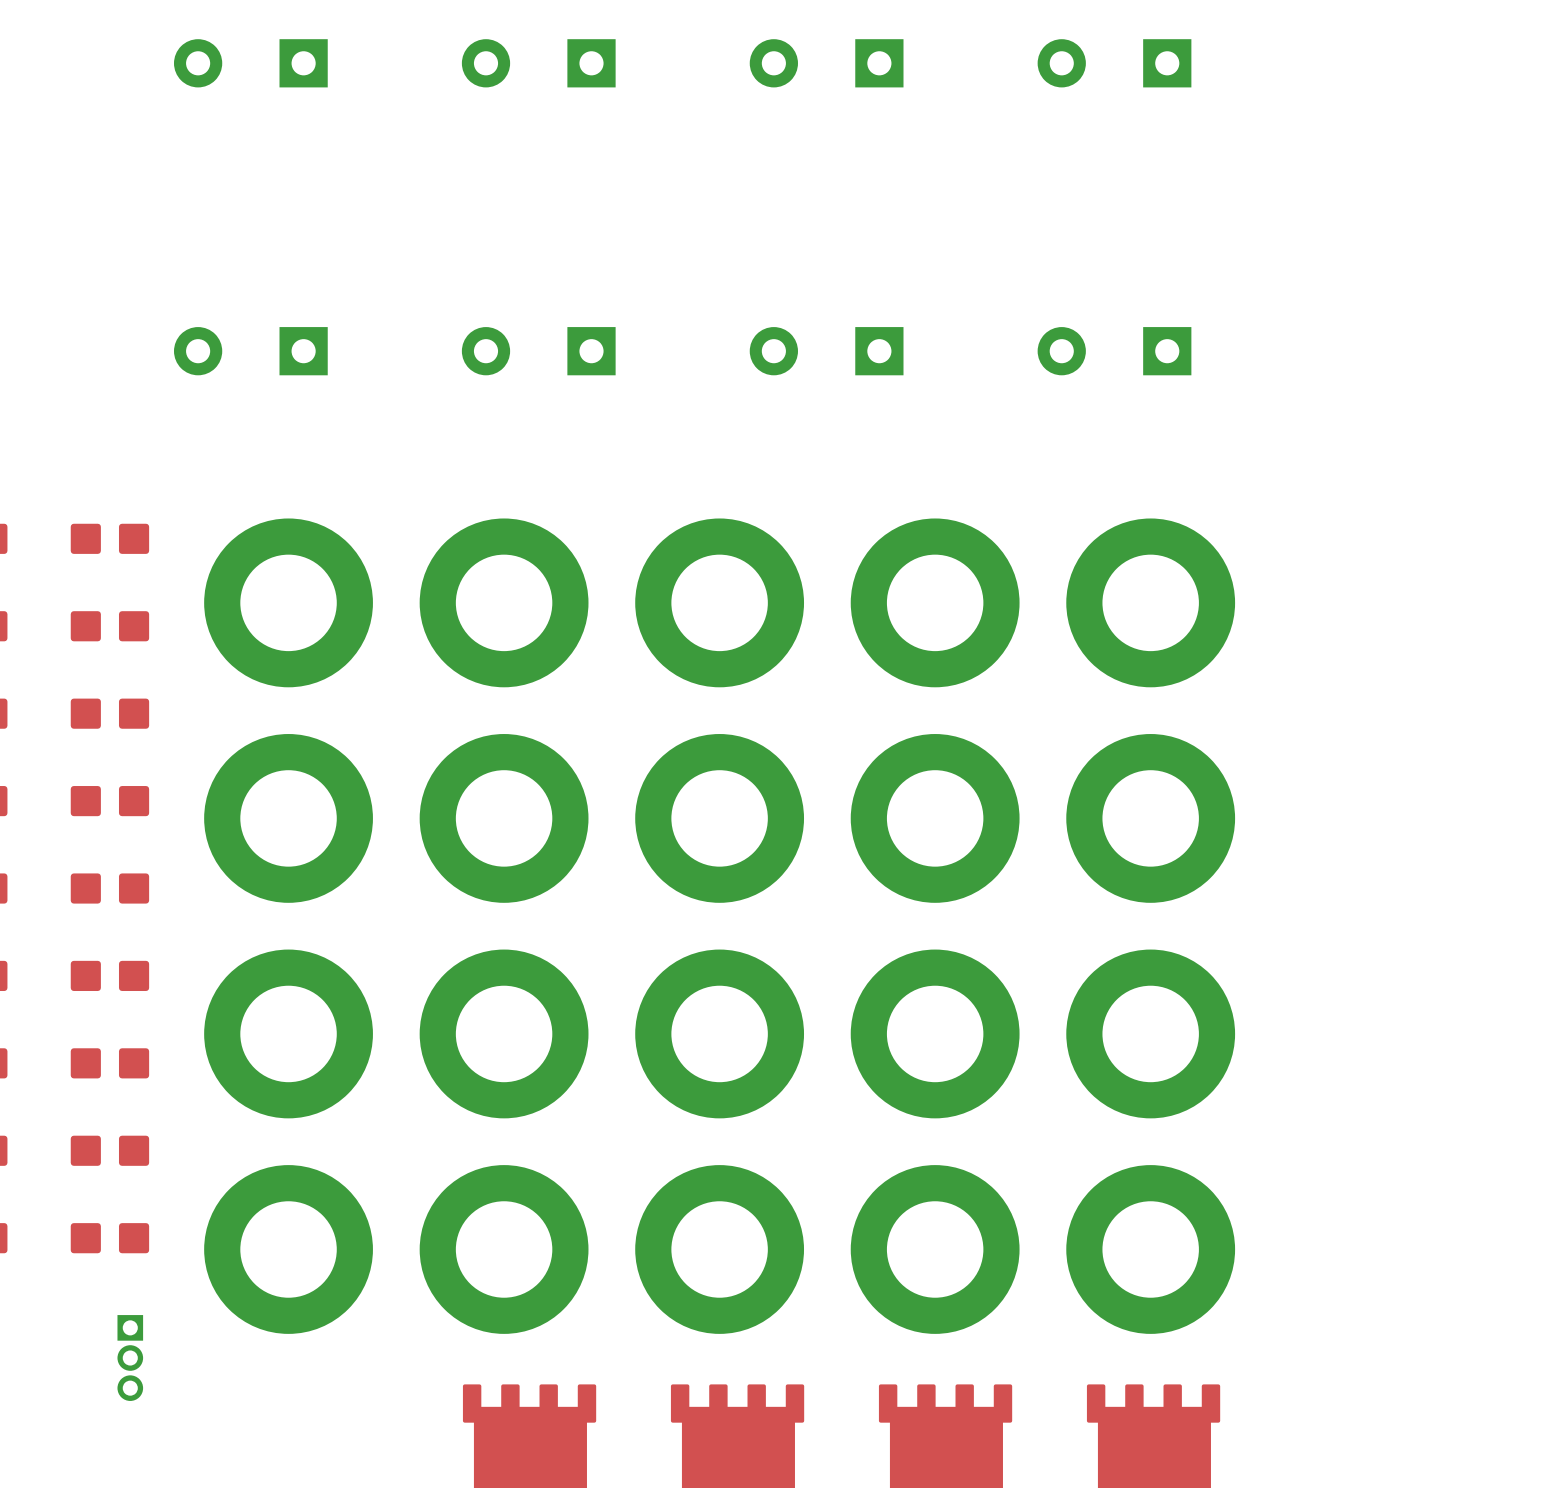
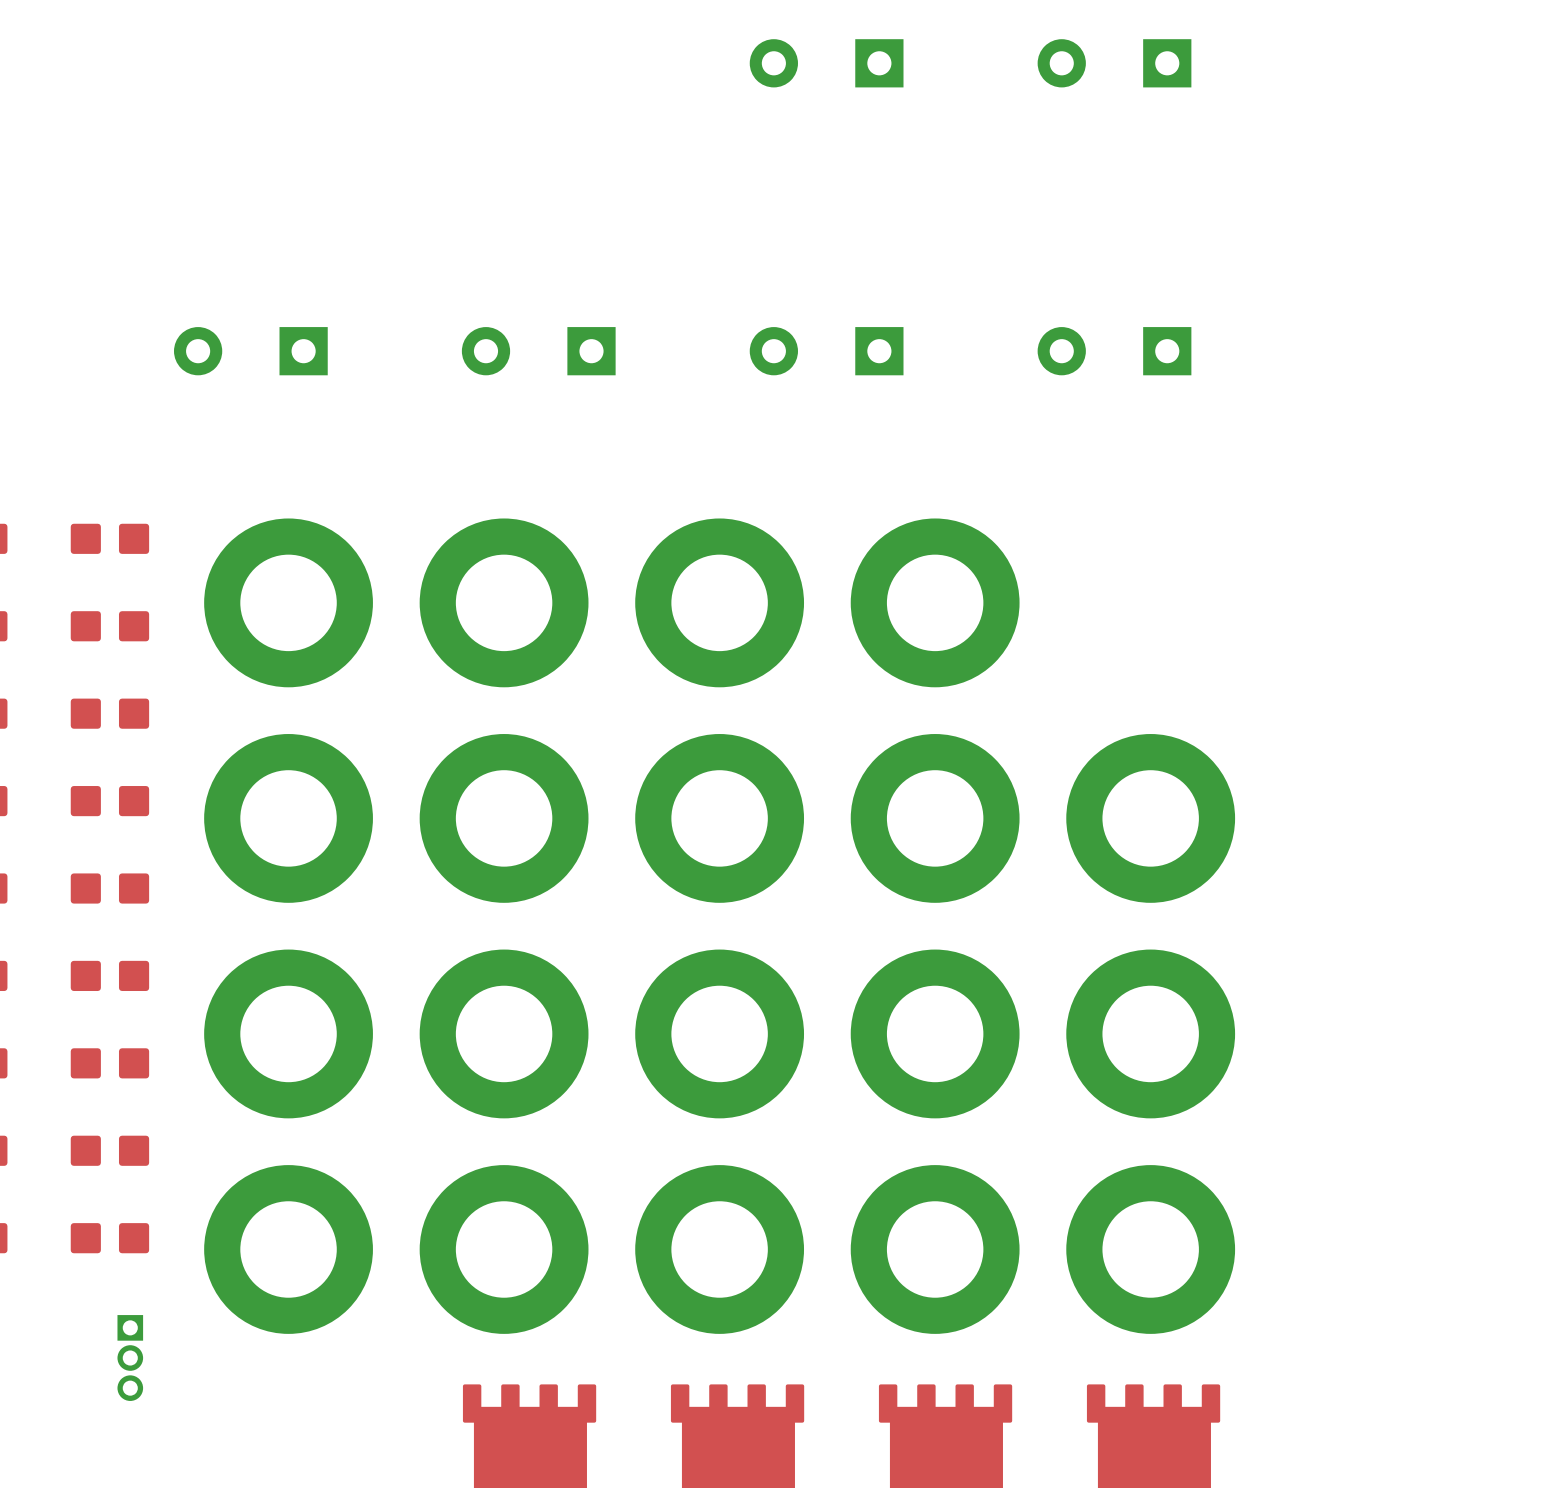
part: (250, 63) -> none
part: (538, 63) -> none
part: (1150, 602) -> none

